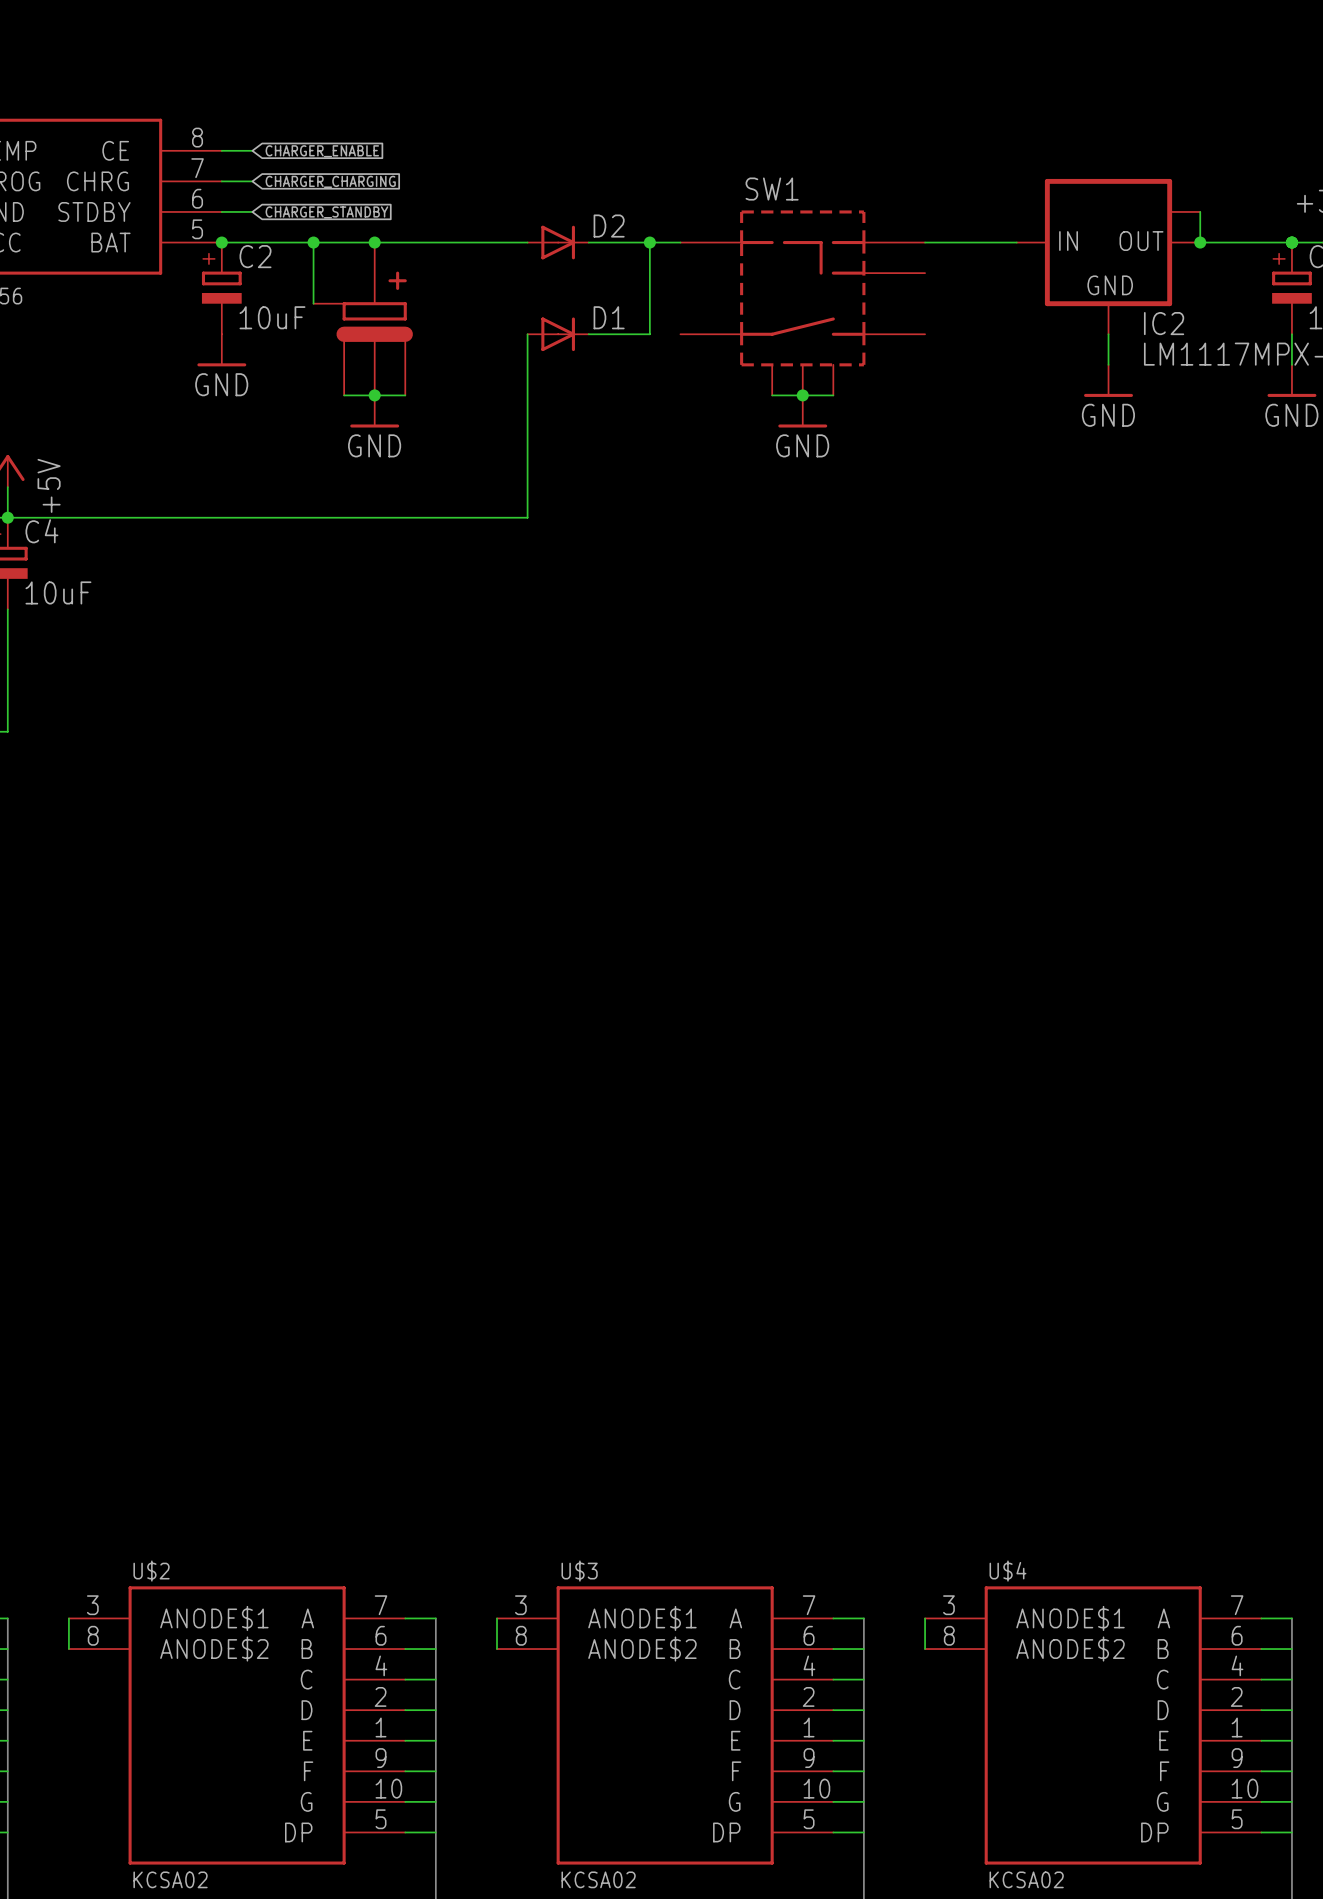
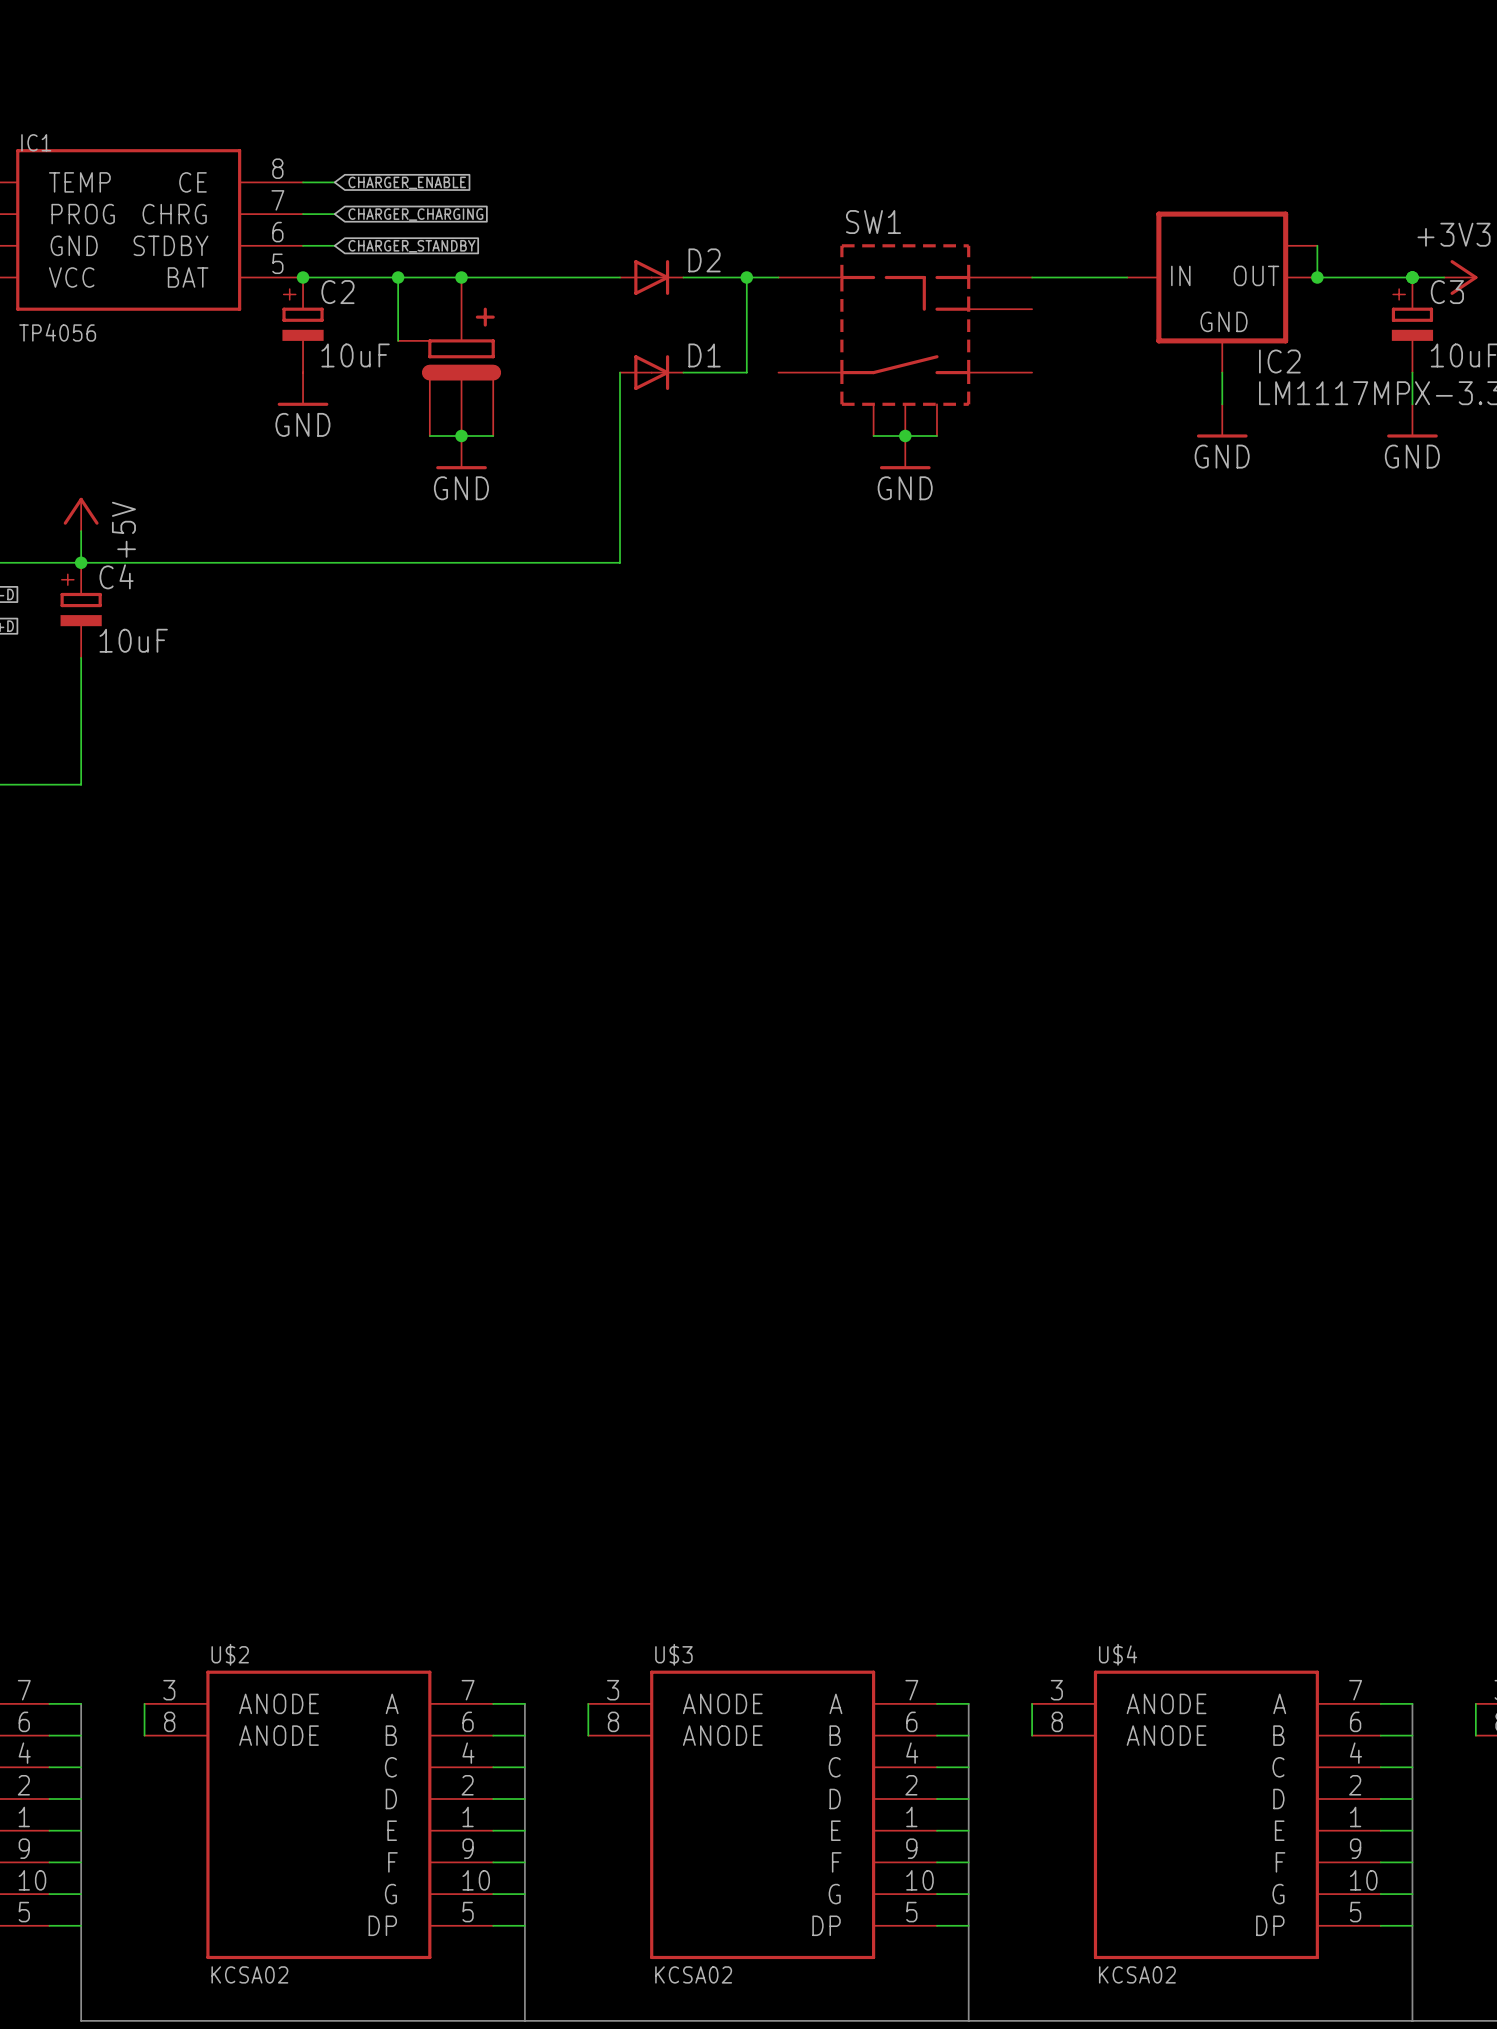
U$2 pin name: ANODE$1 (214, 1618) -> ANODE (279, 1703)
U$3 pin name: ANODE$1 (642, 1618) -> ANODE (722, 1703)
U$4 pin name: ANODE$1 (1070, 1618) -> ANODE (1166, 1703)
U$2 pin name: ANODE$2 (214, 1649) -> ANODE (279, 1735)
U$3 pin name: ANODE$2 (642, 1649) -> ANODE (722, 1735)
U$4 pin name: ANODE$2 (1070, 1649) -> ANODE (1166, 1735)

